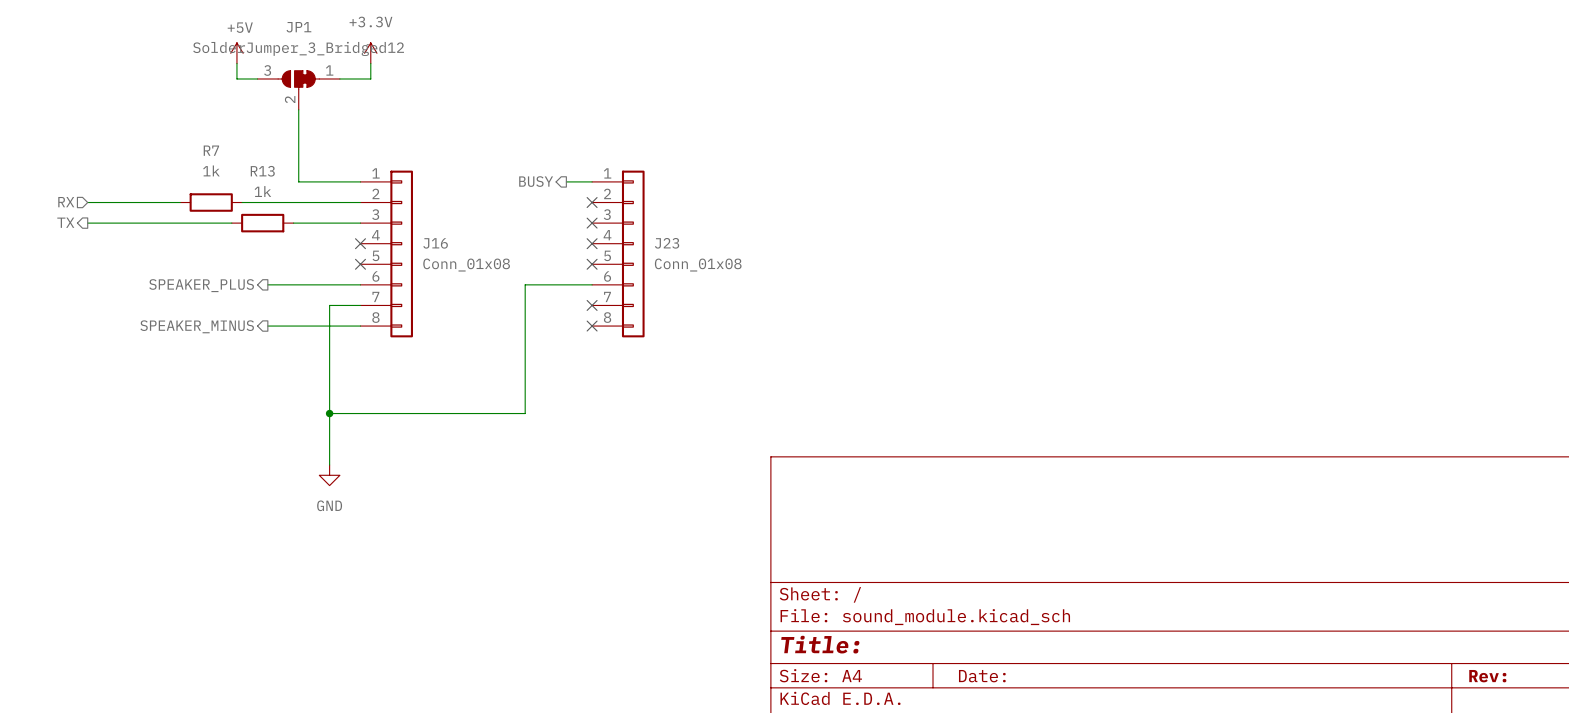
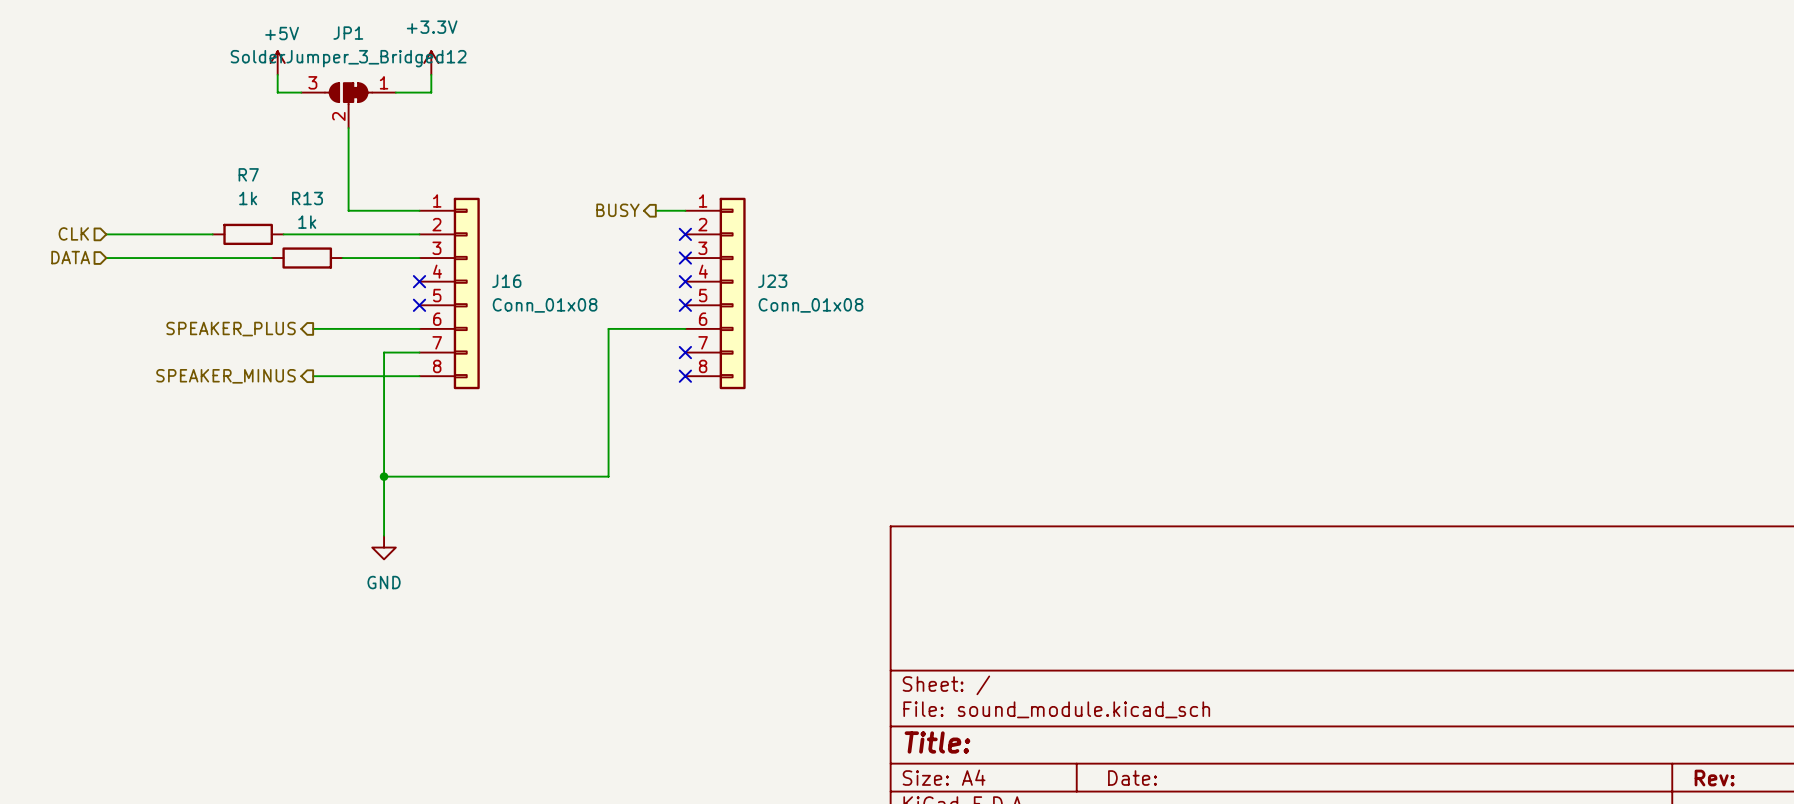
hierarchical label: RX (66, 202) -> CLK (73, 233)
hierarchical label shape: output (65, 222) -> input (70, 257)
hierarchical label: TX (65, 222) -> DATA (70, 257)

